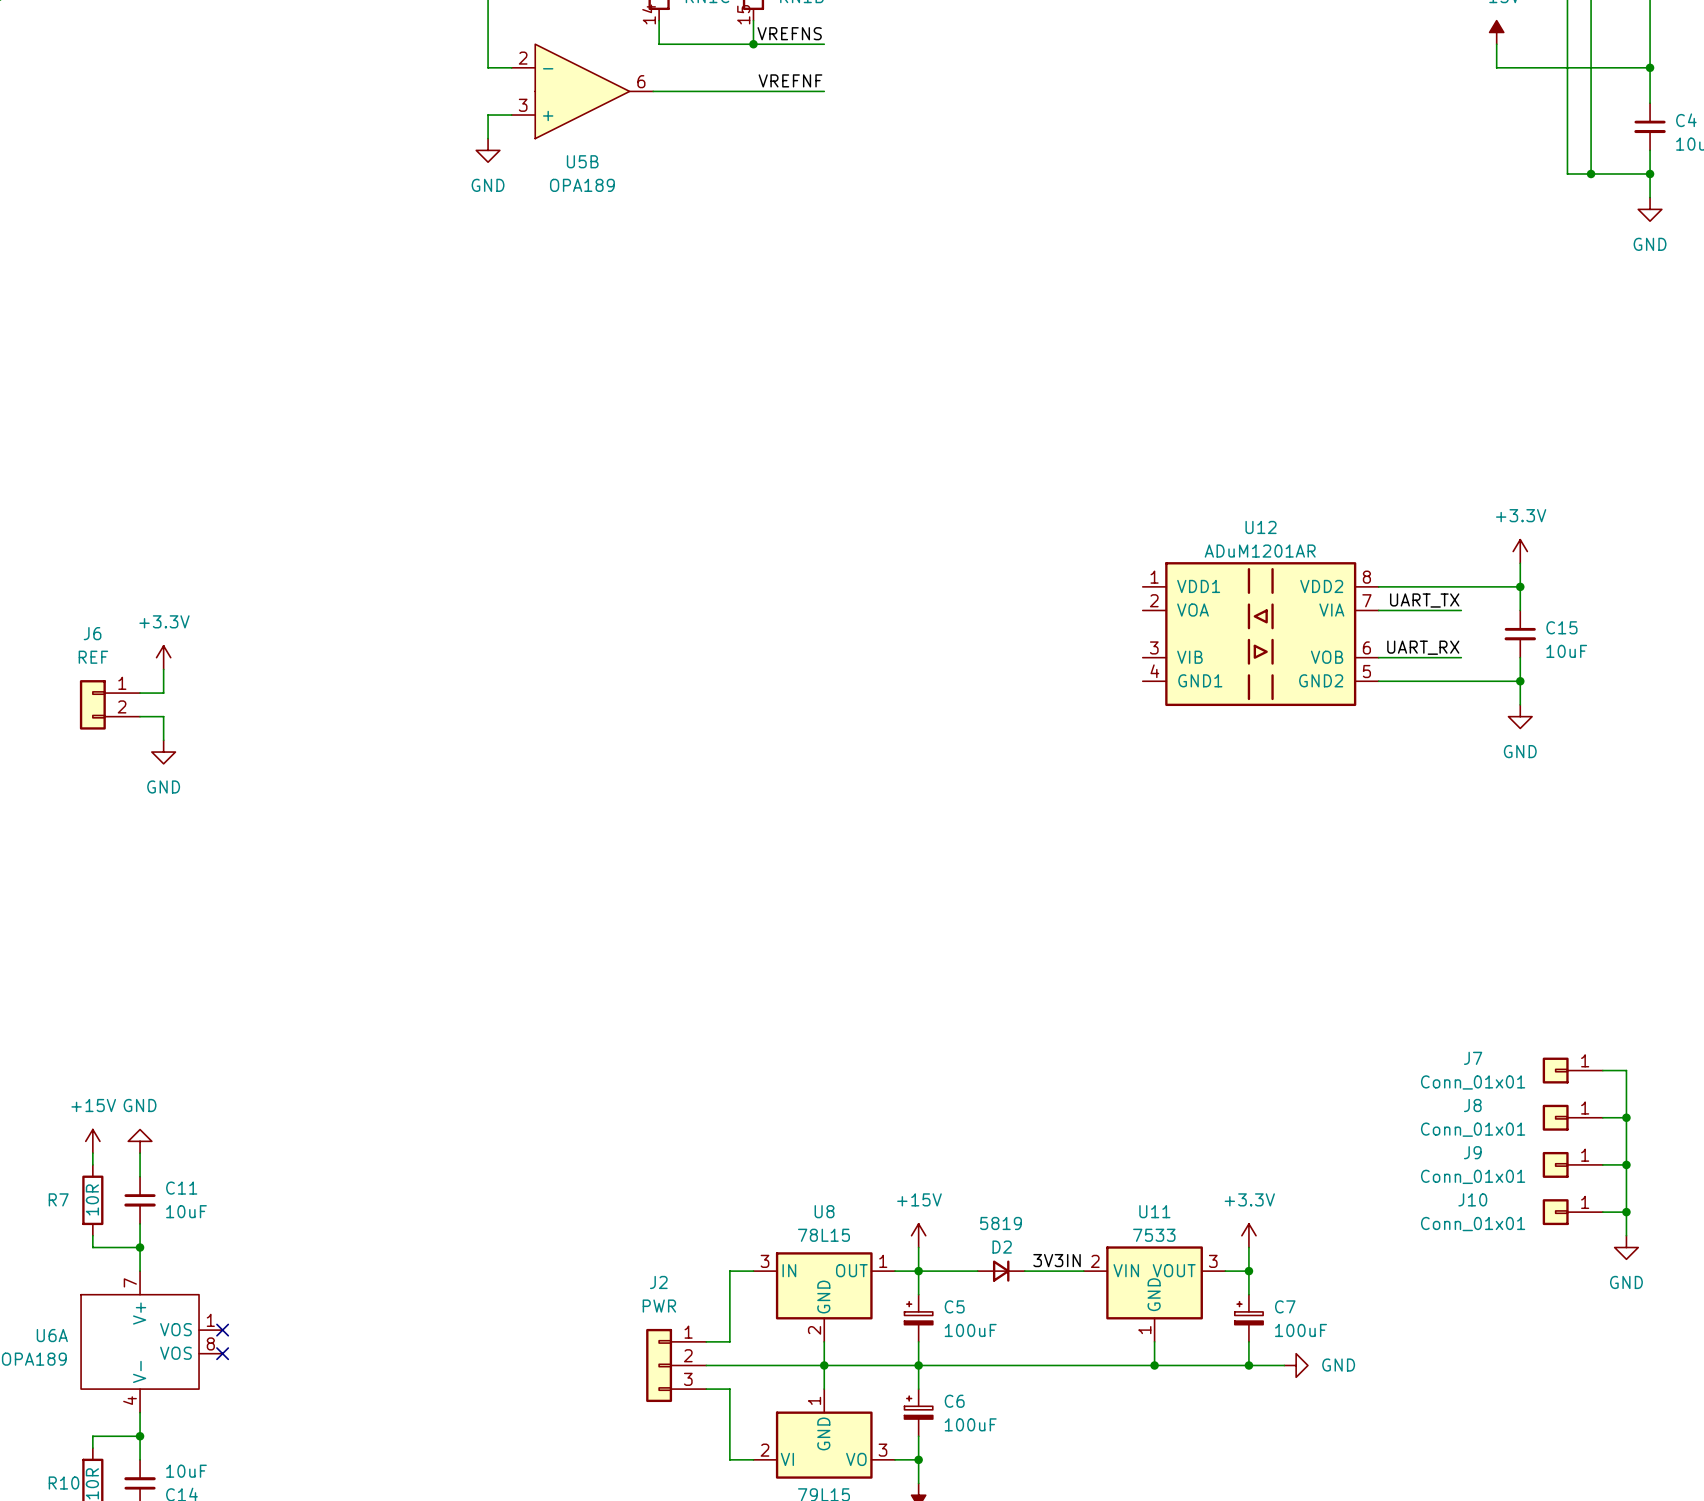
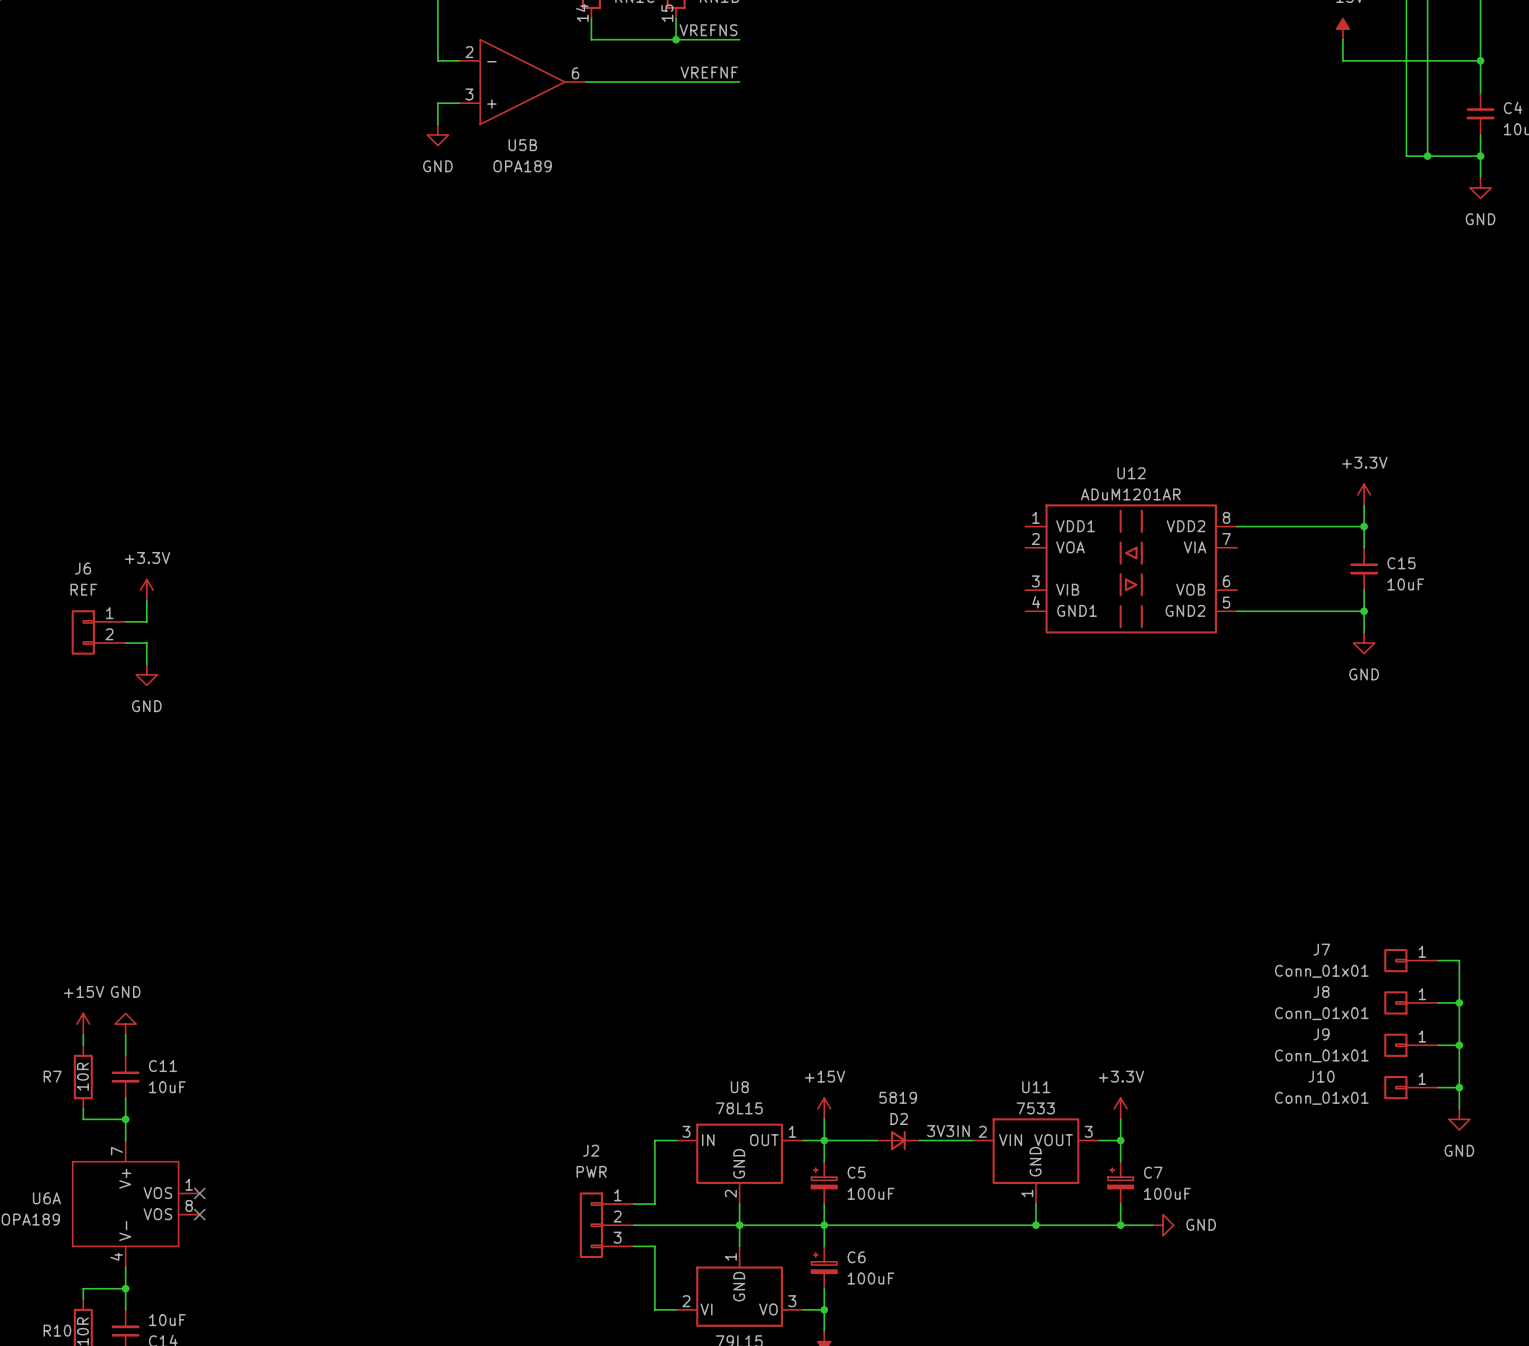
label: UART_TX (1424, 600) -> none
wire: (1378, 610) (1461, 610) -> none
label: UART_RX (1423, 647) -> none
wire: (1378, 657) (1461, 657) -> none

